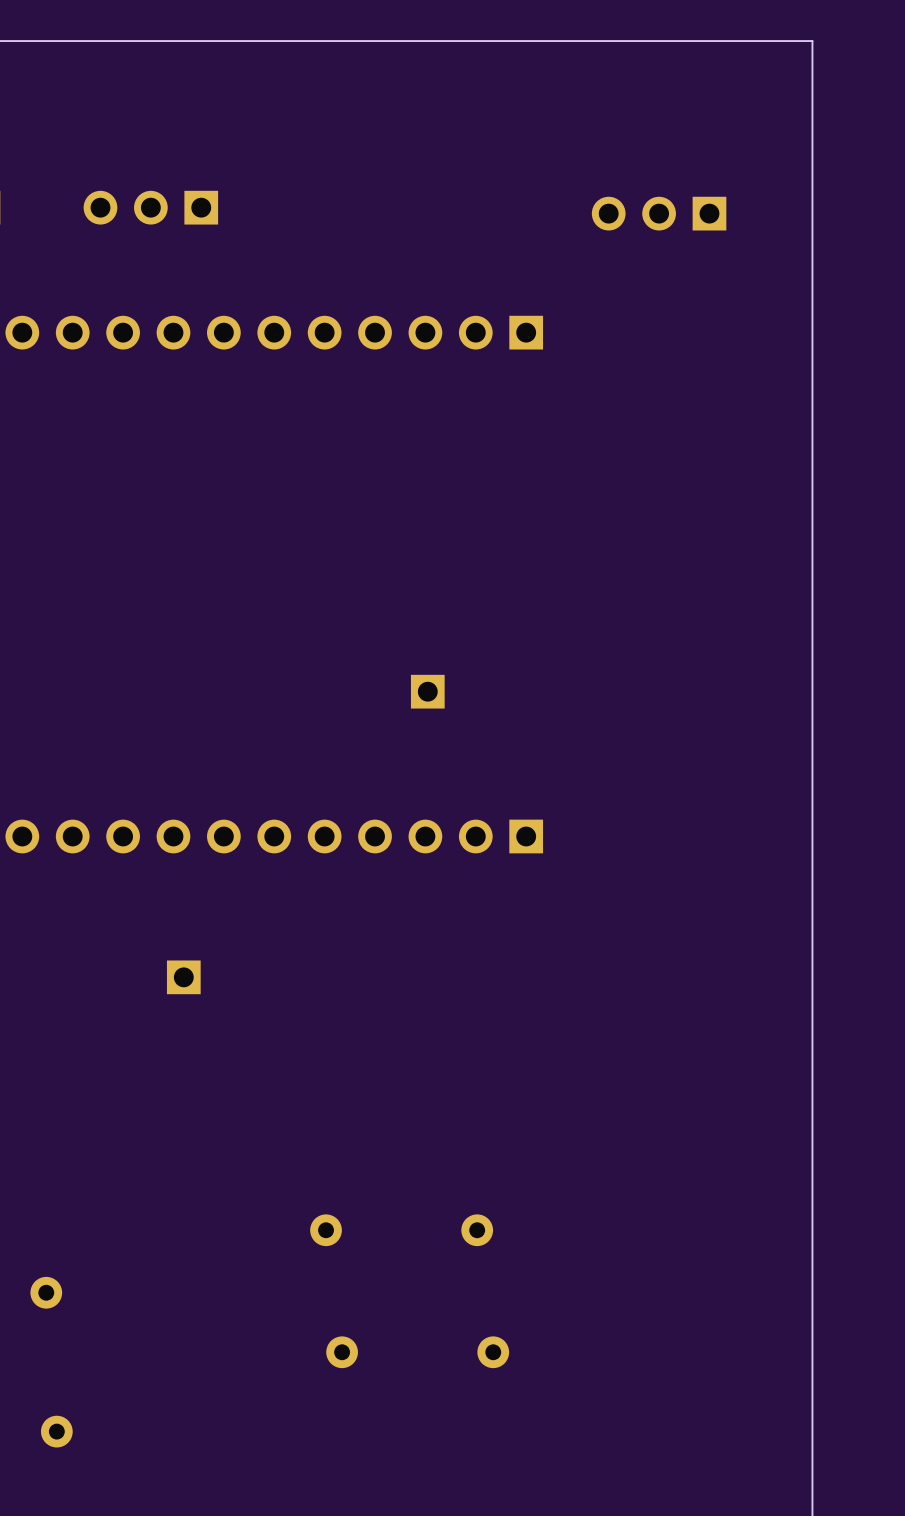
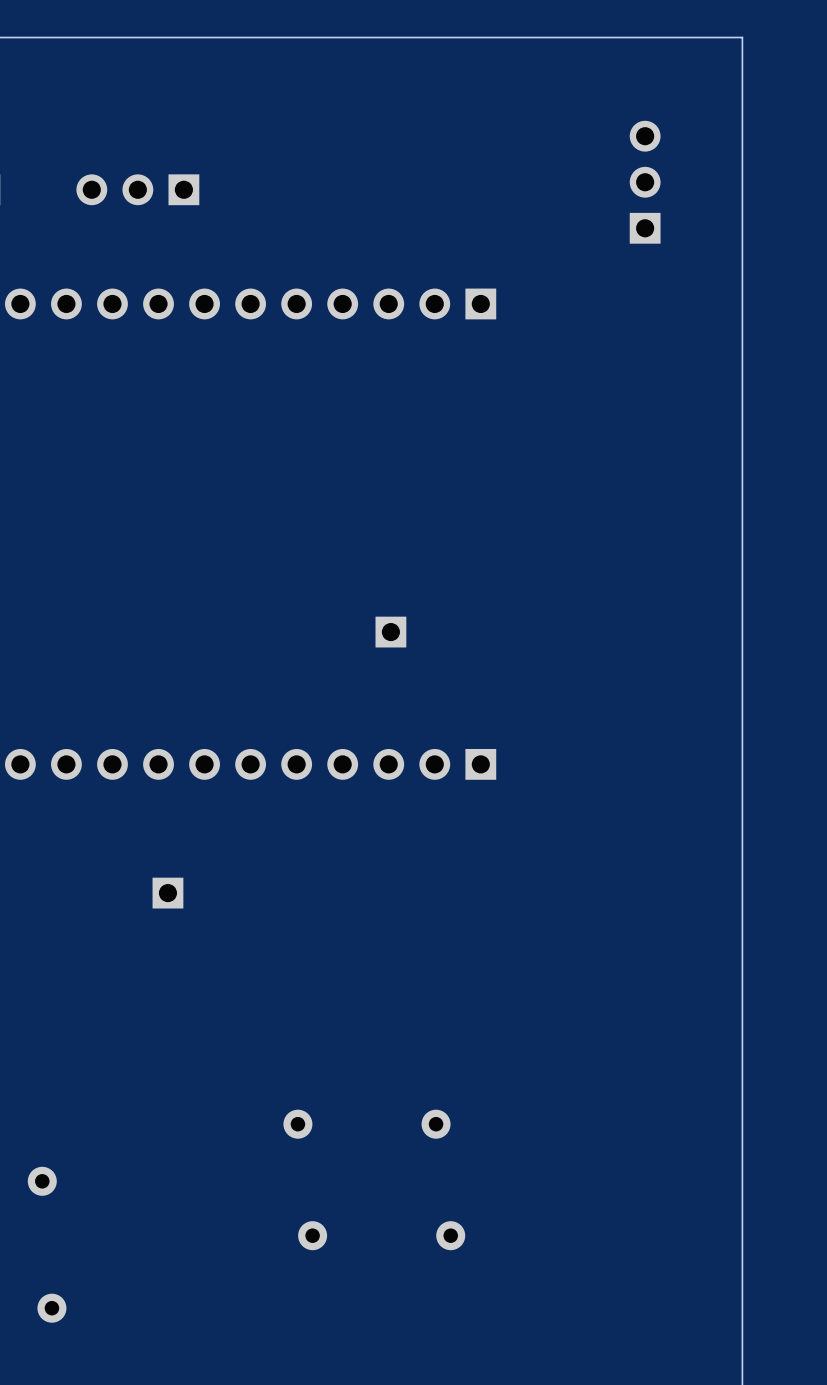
part rotation: 0° (659, 213) -> 90° clockwise (645, 182)

